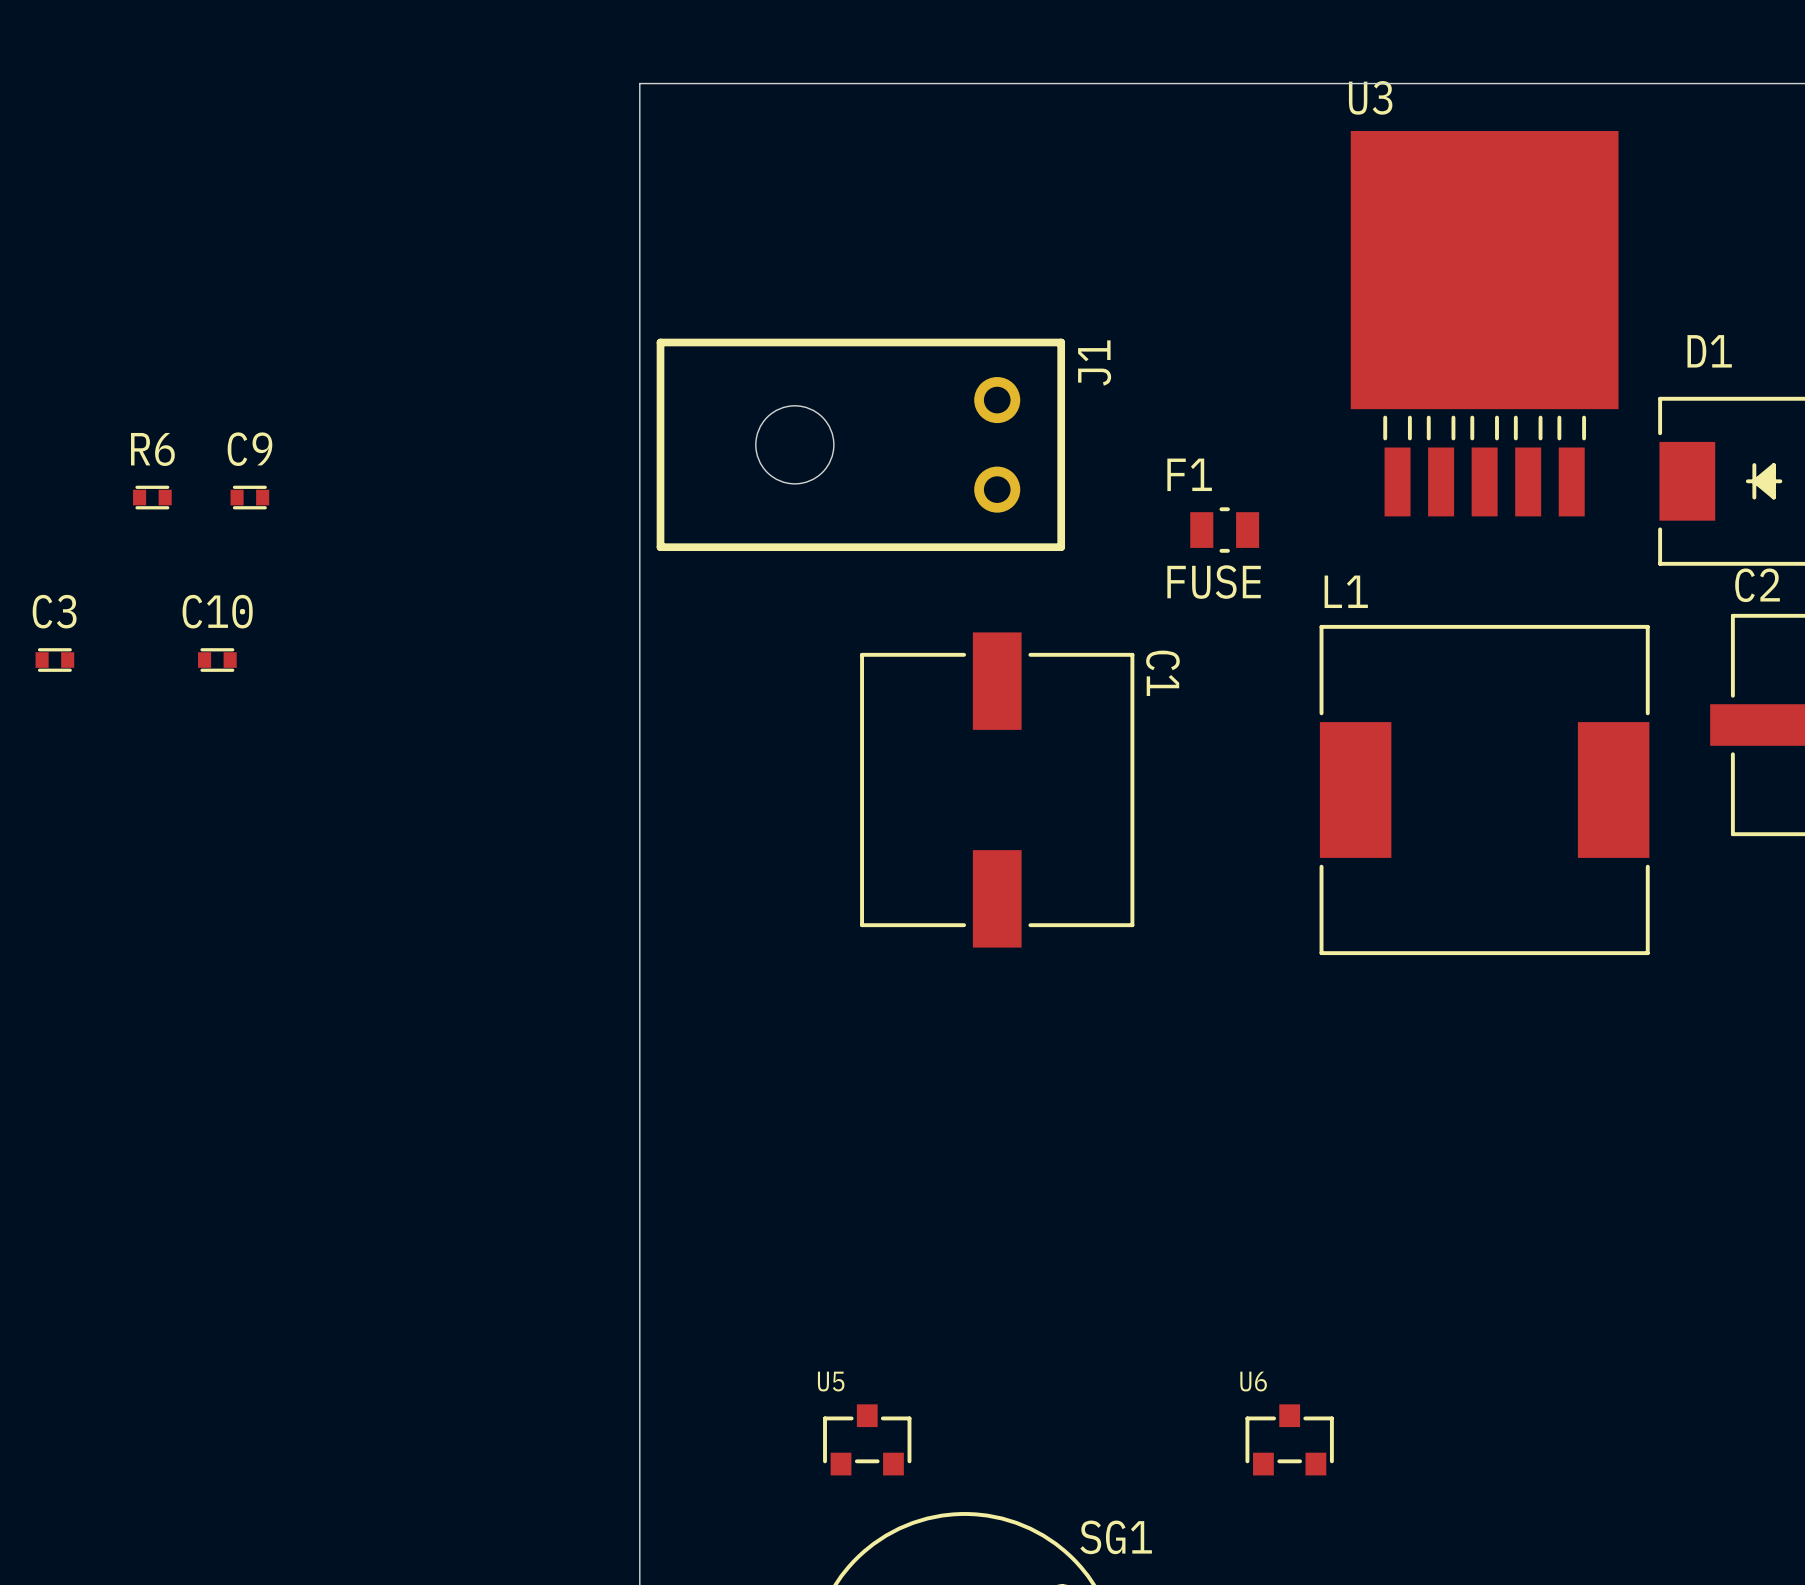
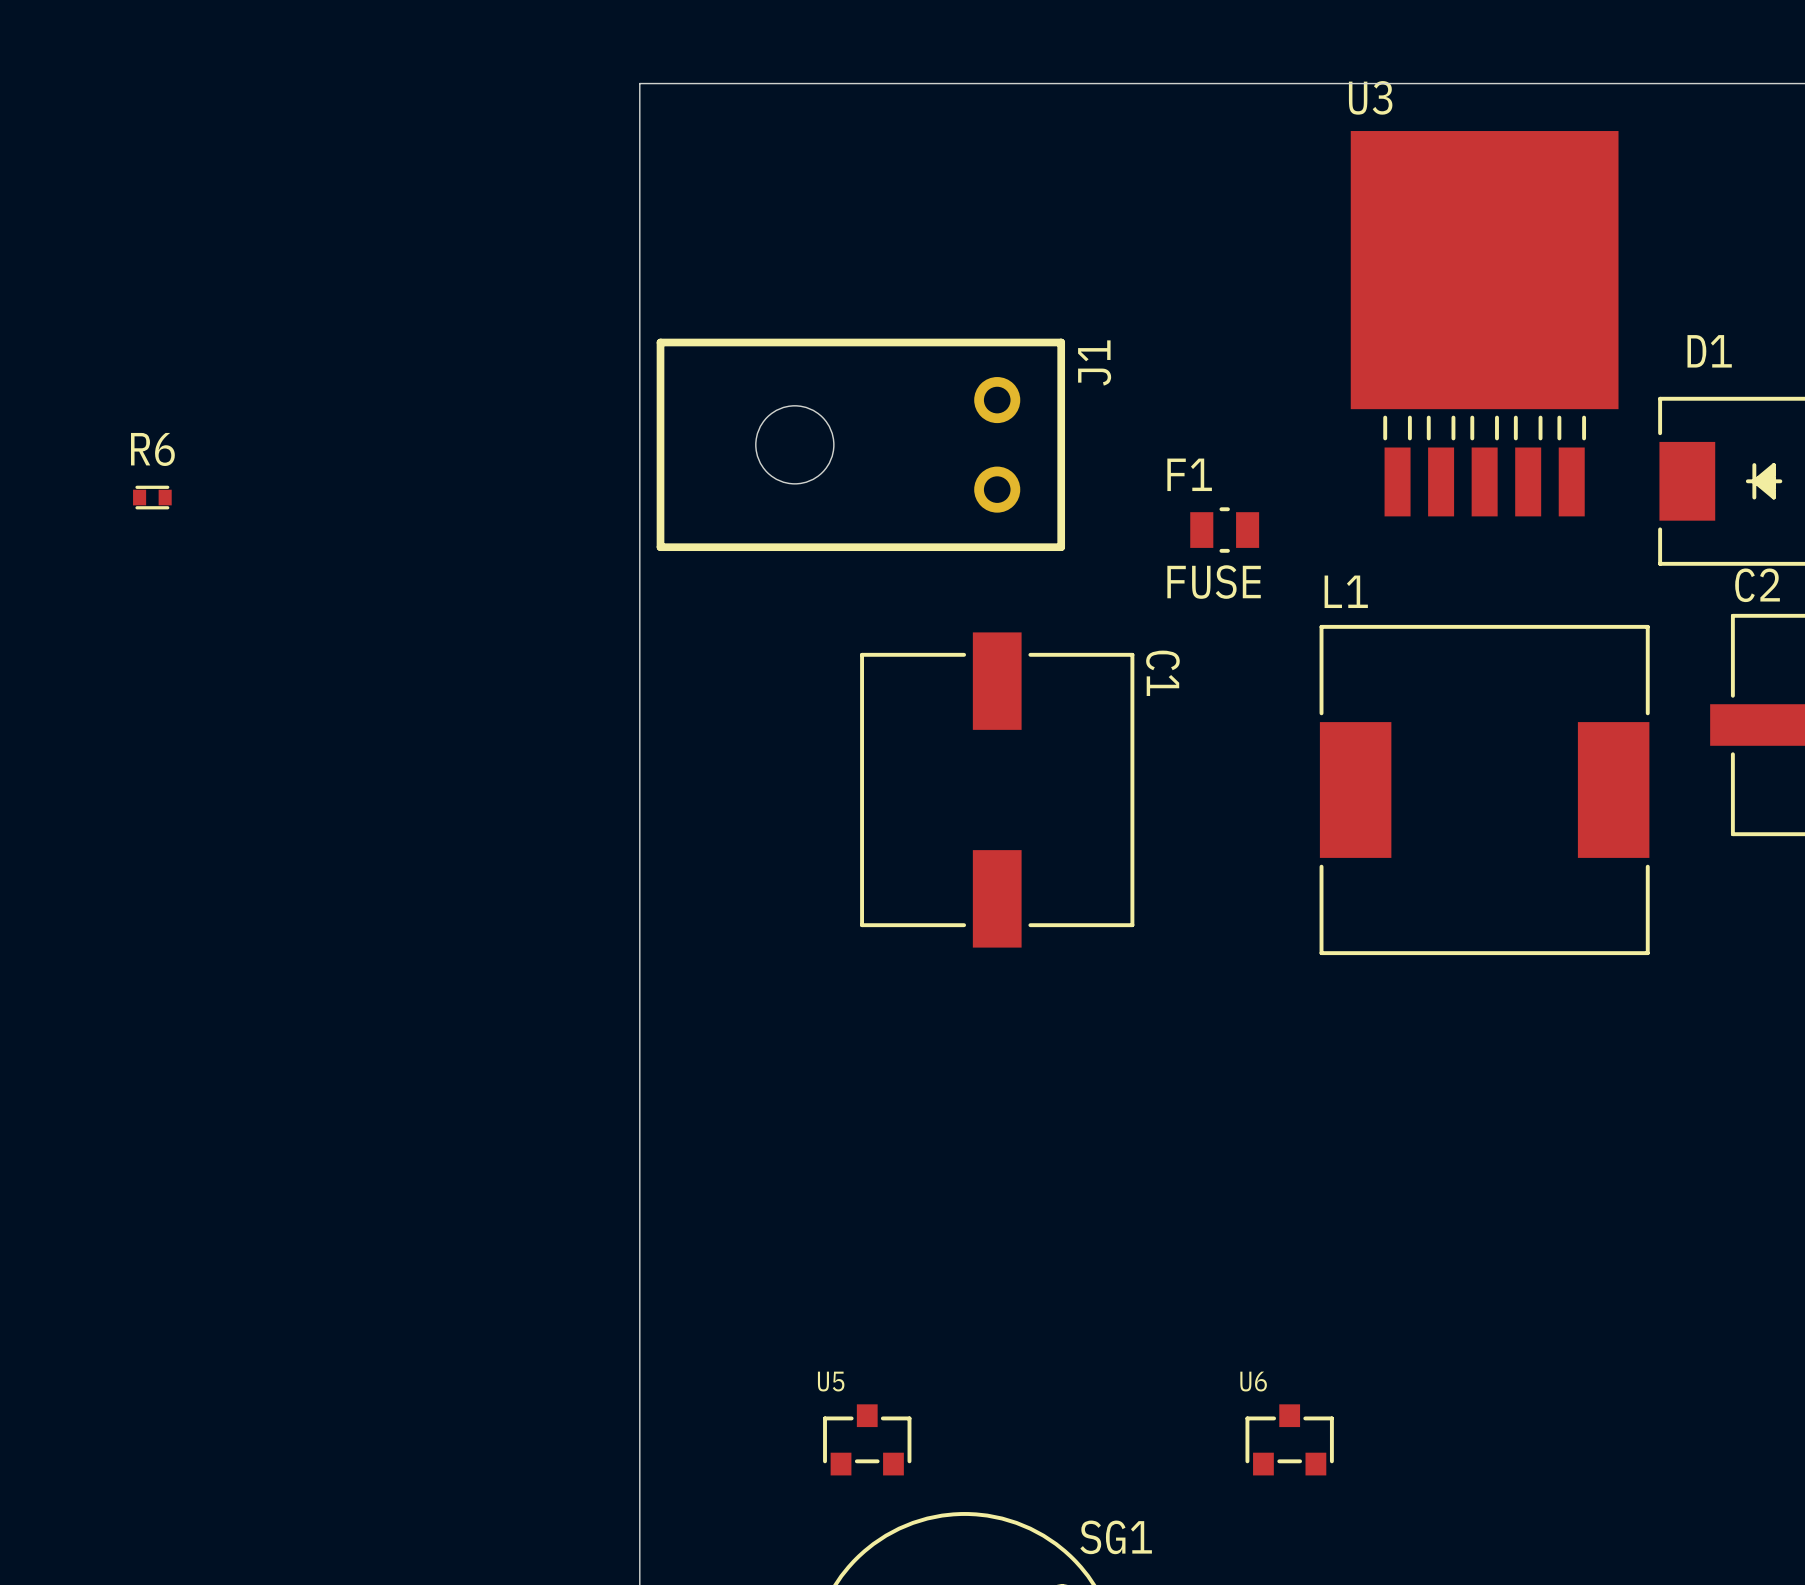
C9: (249, 497) -> none
C3: (54, 660) -> none
C10: (217, 660) -> none

